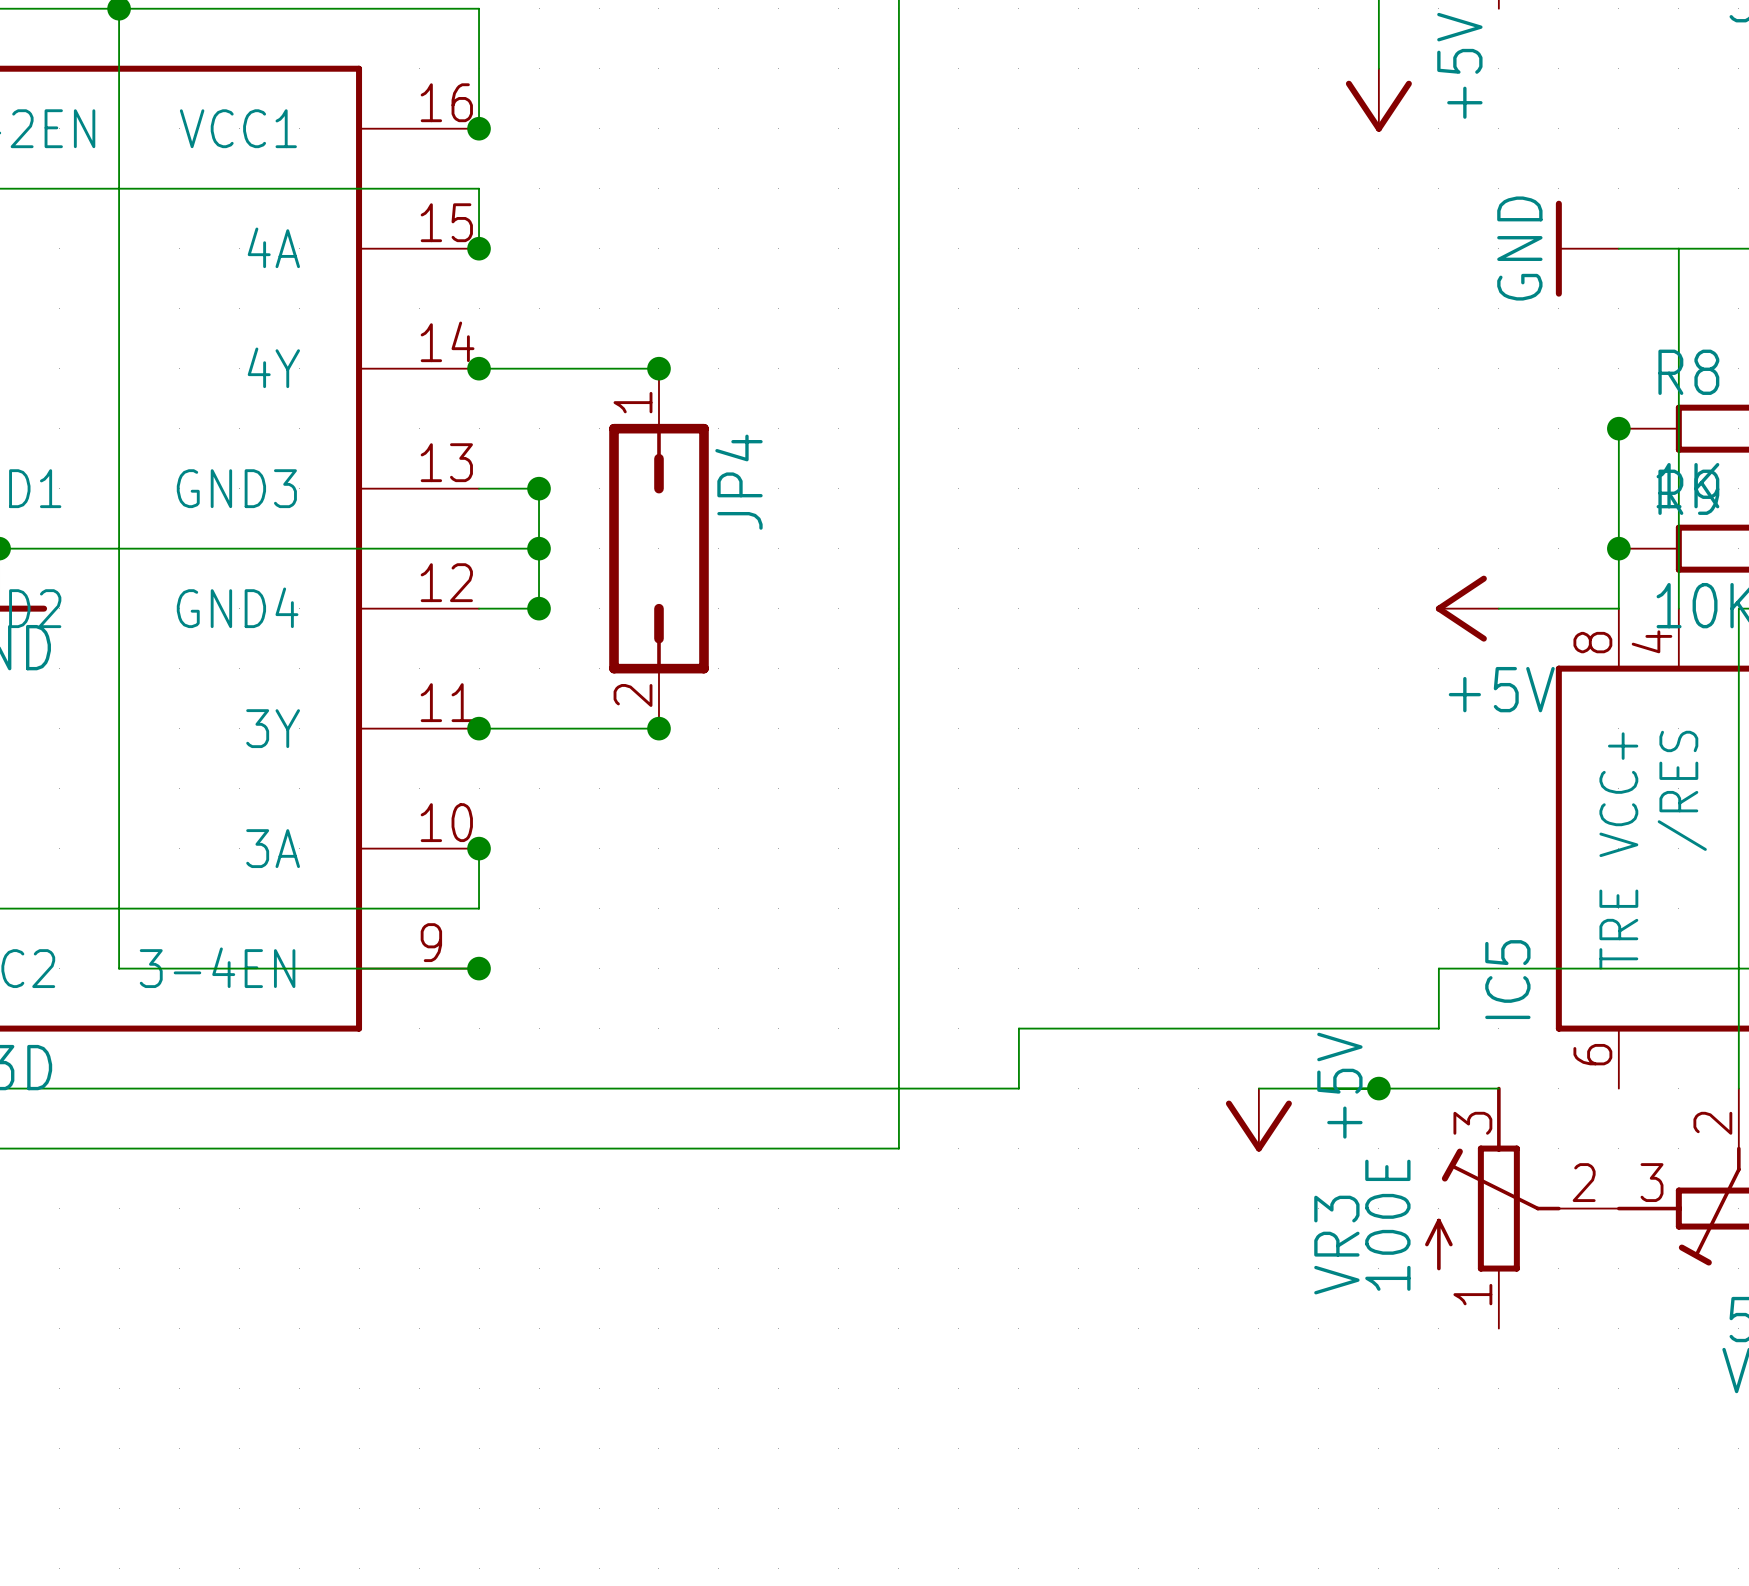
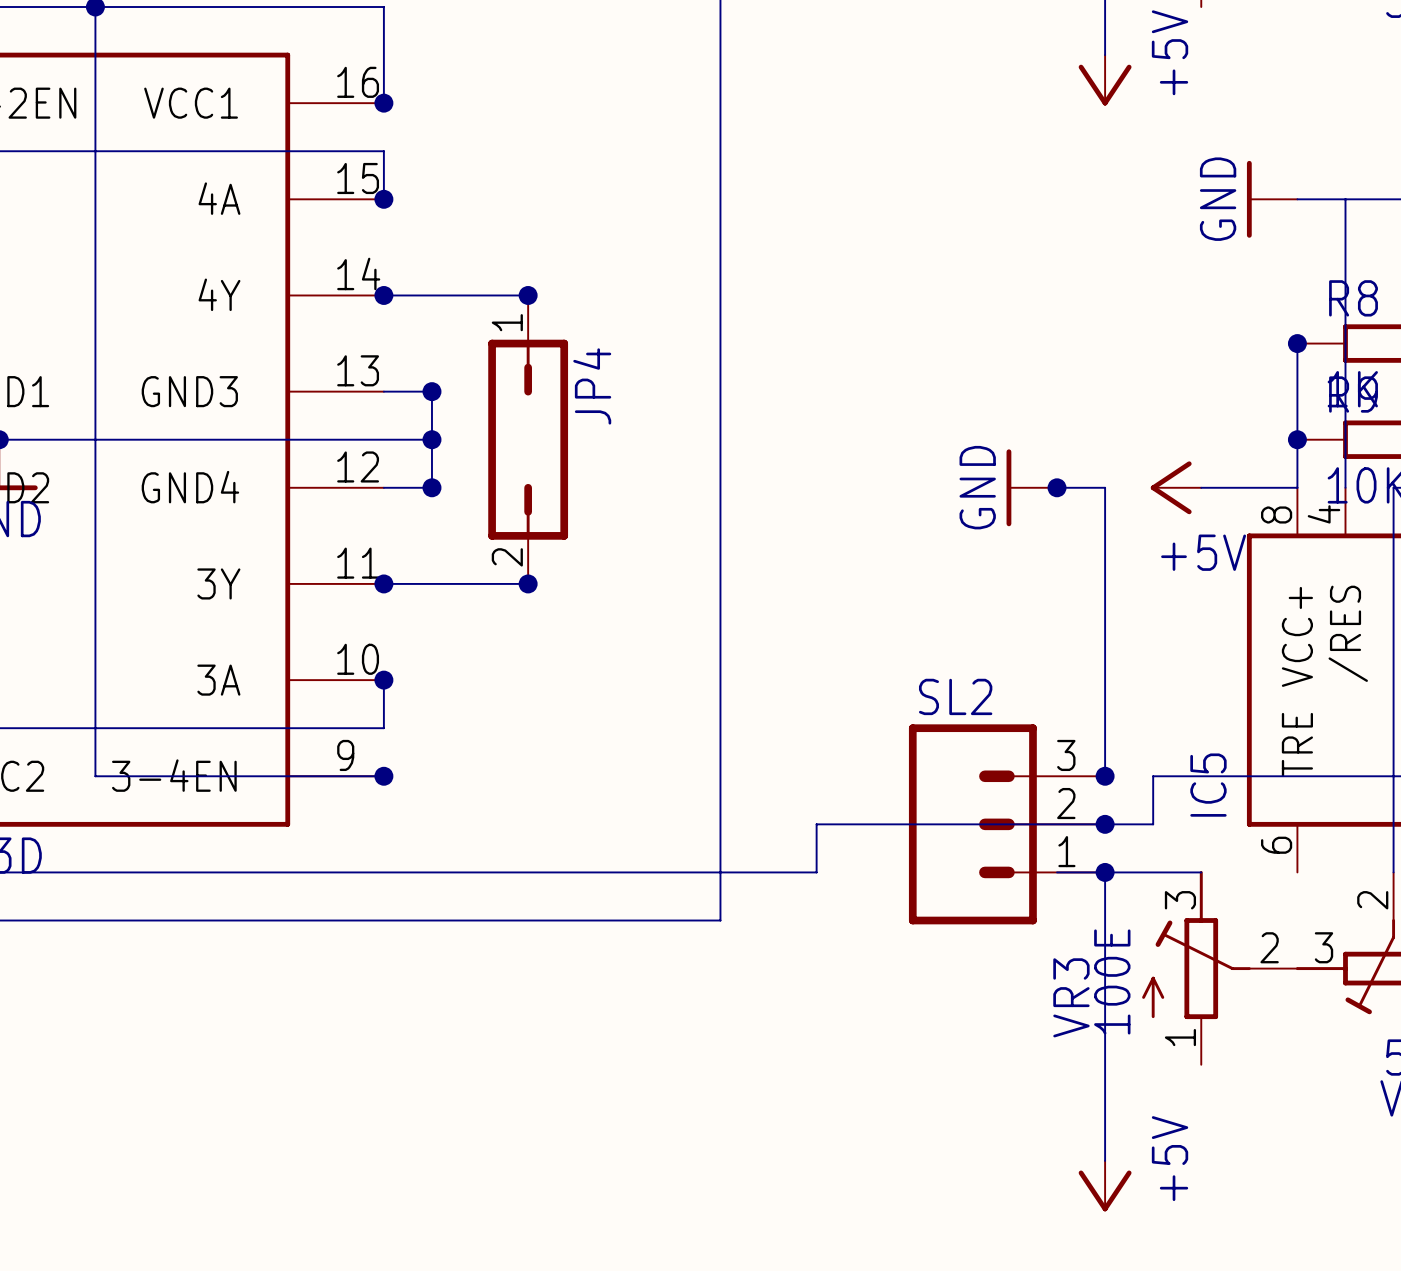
power symbol: none -> GND (1031, 487)
wire: none -> (1057, 487) (1105, 487) (1105, 776)
junction: none -> (1057, 487)
junction: none -> (1105, 776)
SL2: none -> (1007, 824)
junction: none -> (1105, 824)
wire: none -> (1105, 872) (1105, 1160)
power symbol position: +5V (1258, 1120) -> +5V (1105, 1186)

